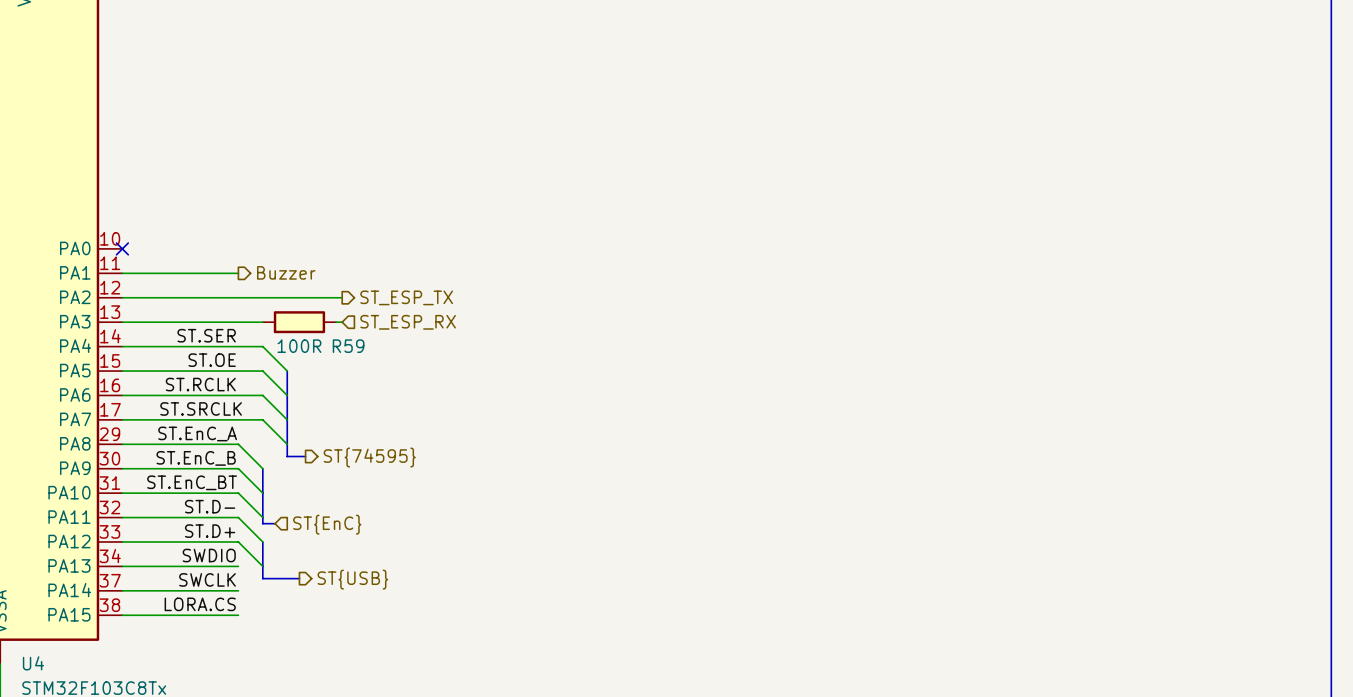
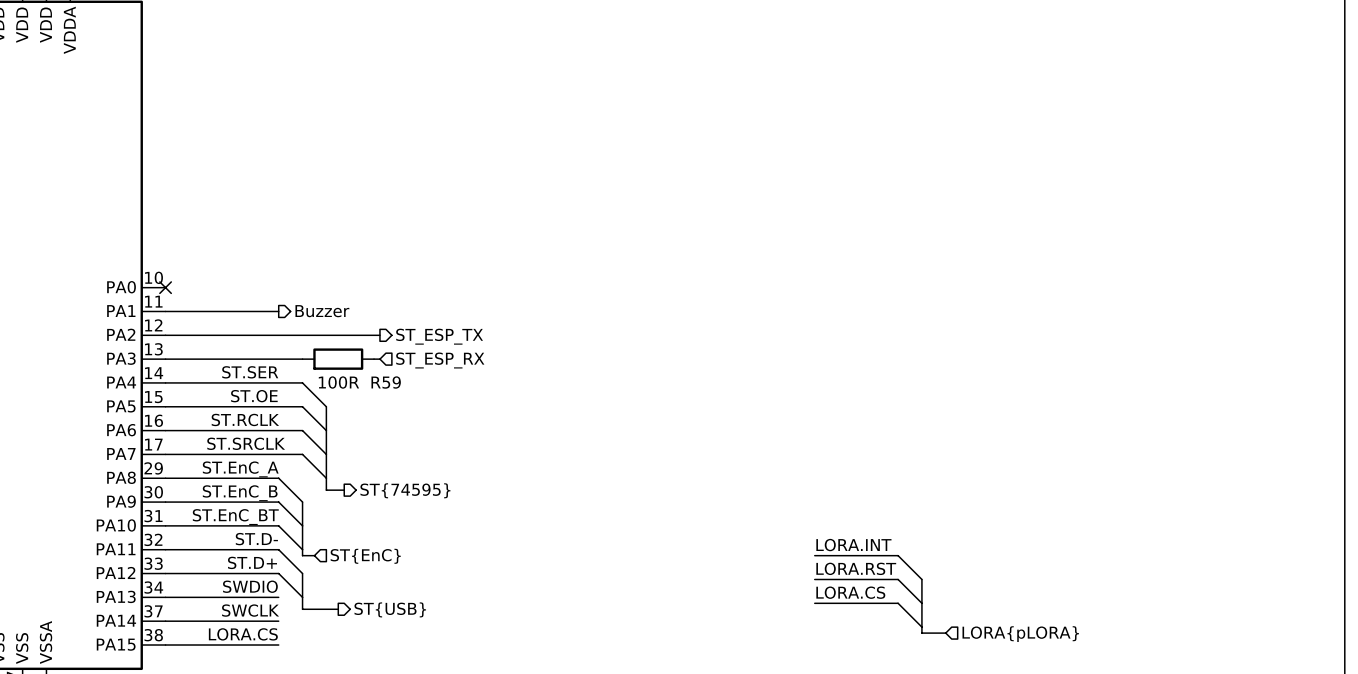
label: none -> LORA.INT (853, 545)
wire: none -> (814, 555) (898, 555) (921, 579)
label: none -> LORA.RST (856, 568)
wire: none -> (814, 579) (898, 579) (921, 603)
bus: none -> (921, 579) (921, 633) (945, 633)
label: none -> LORA.CS (850, 592)
wire: none -> (814, 603) (898, 603) (921, 627)
hierarchical label: none -> LORA{pLORA} (1020, 634)

